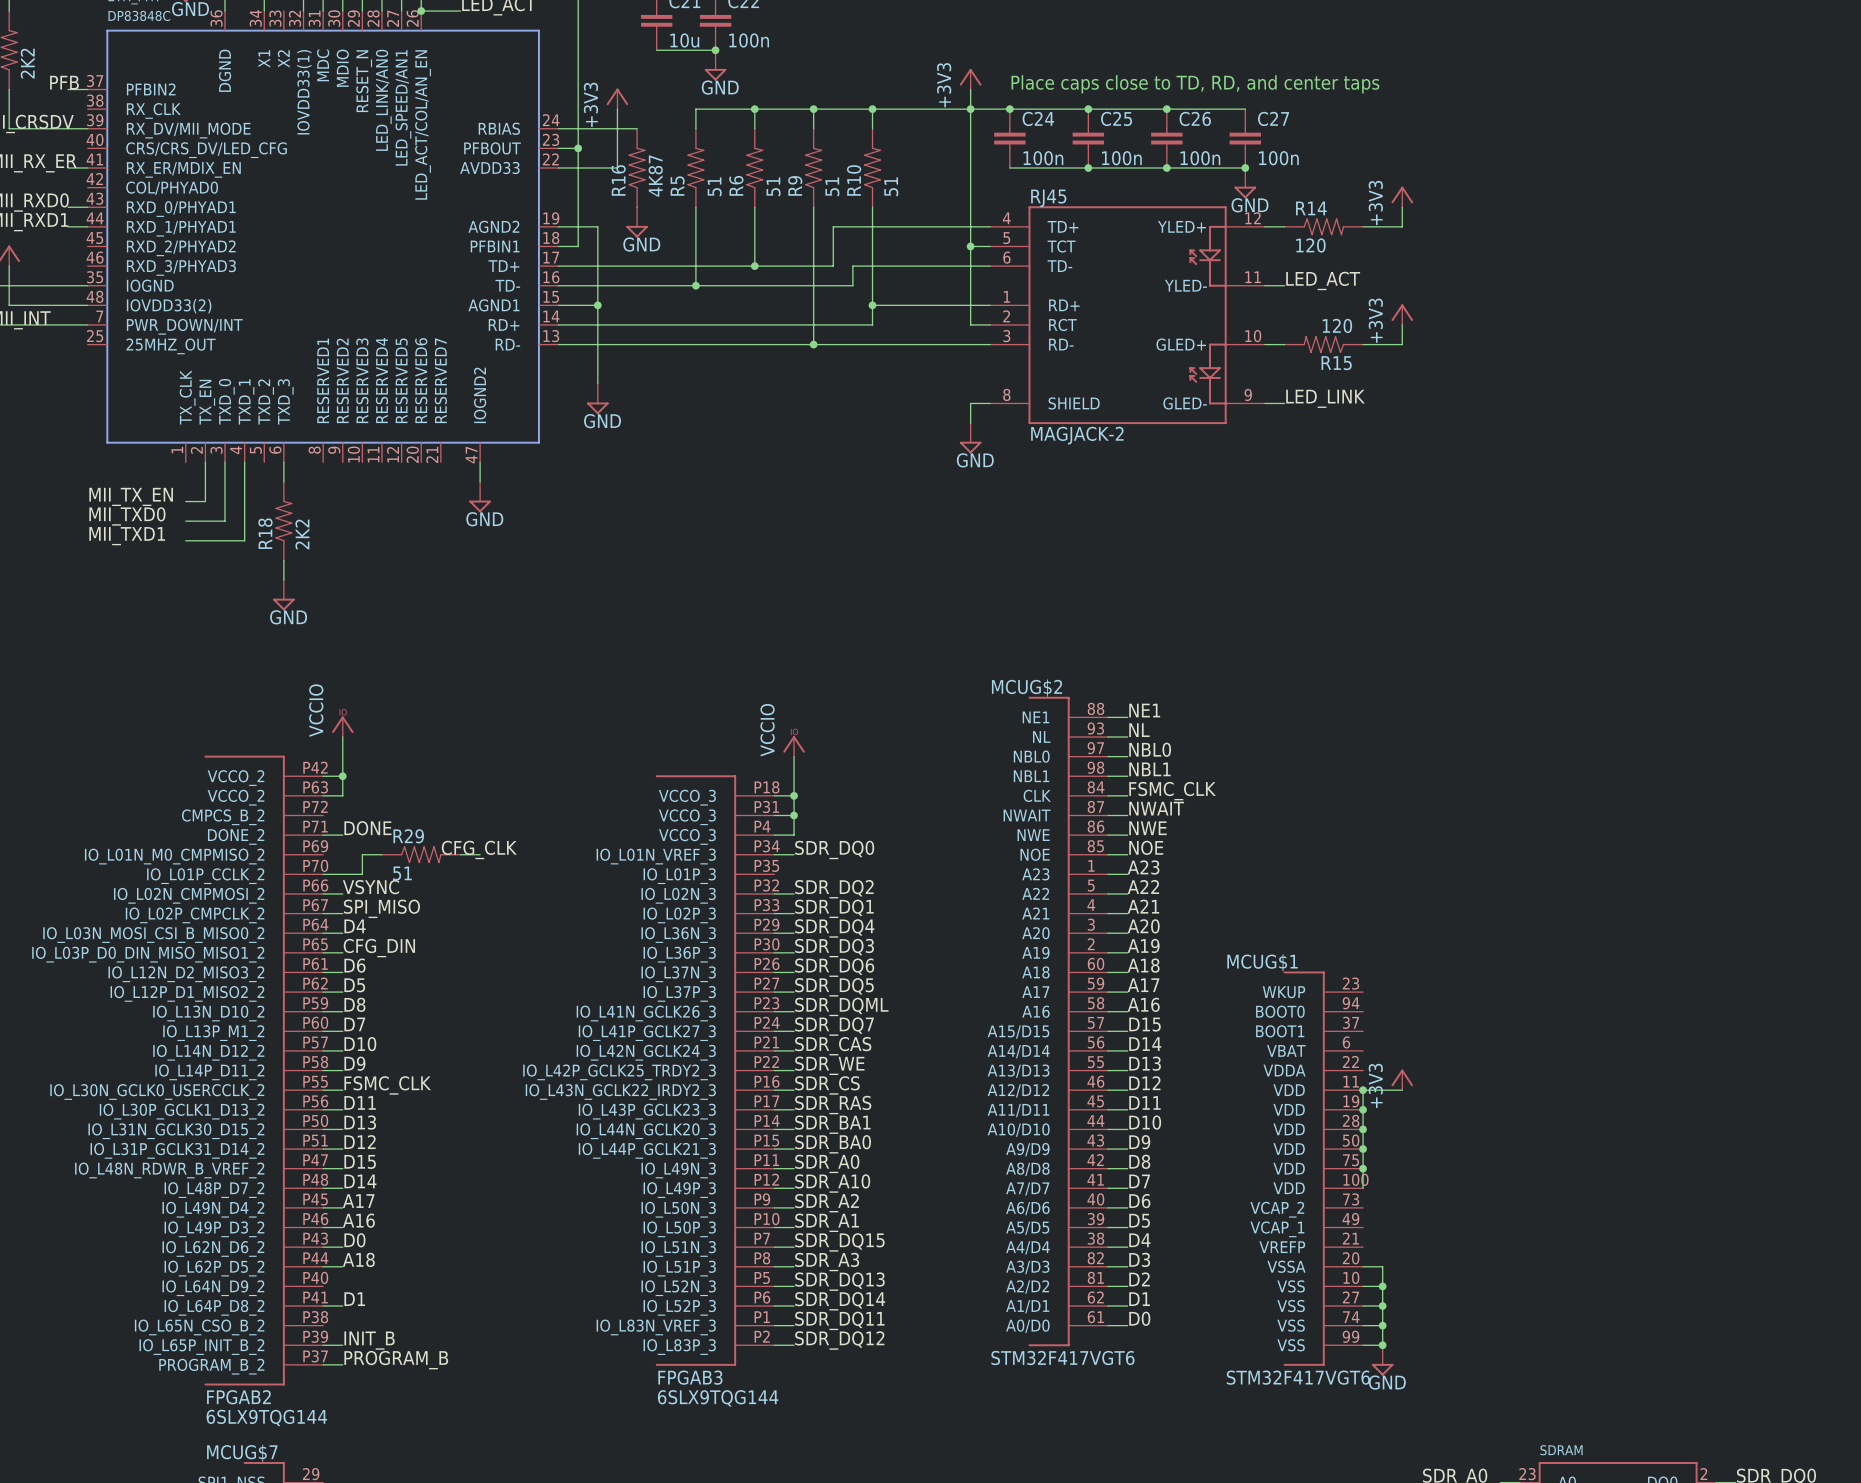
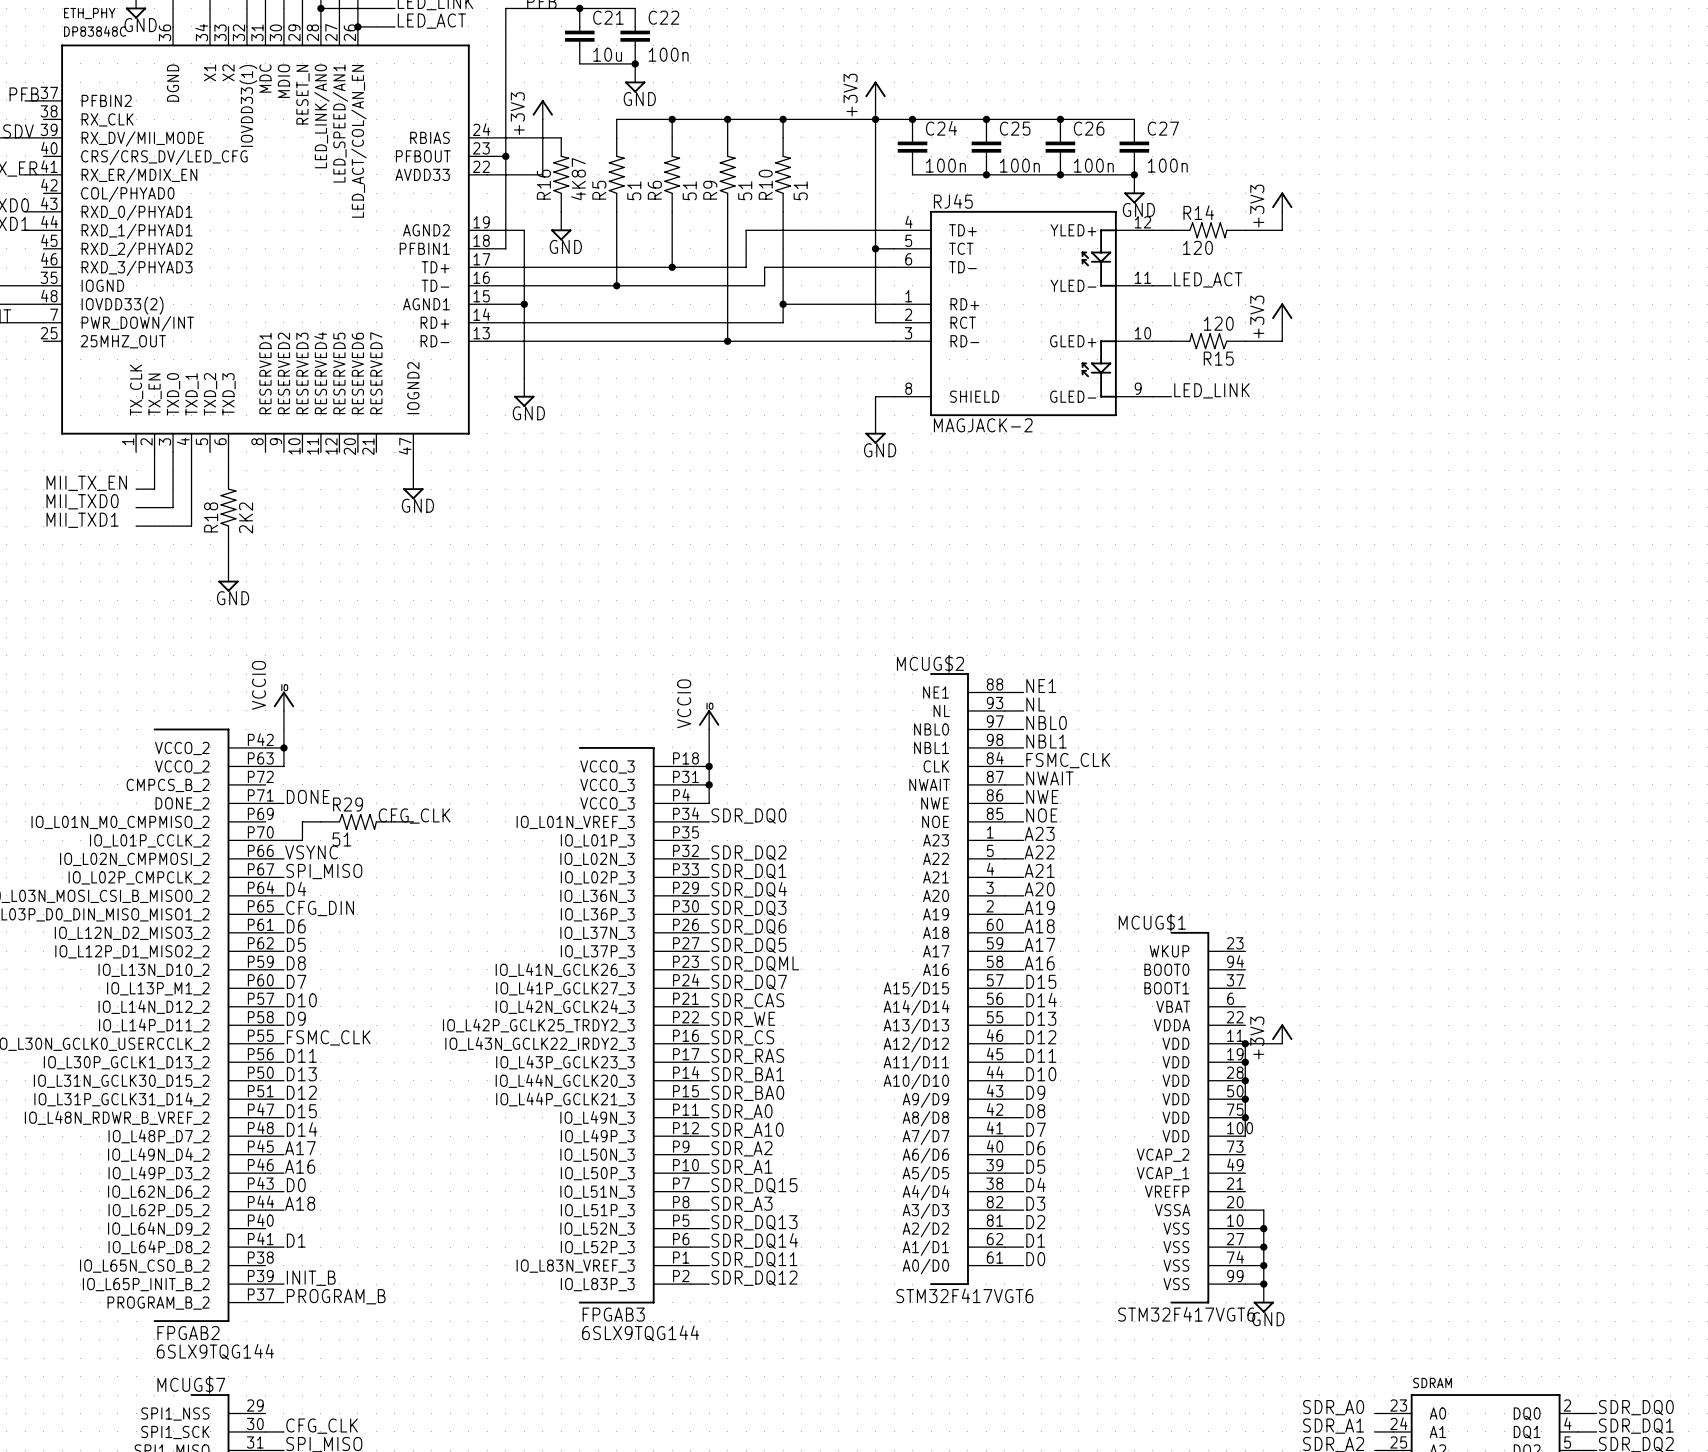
text: Place caps close to TD, RD, and center taps (1195, 84) -> none

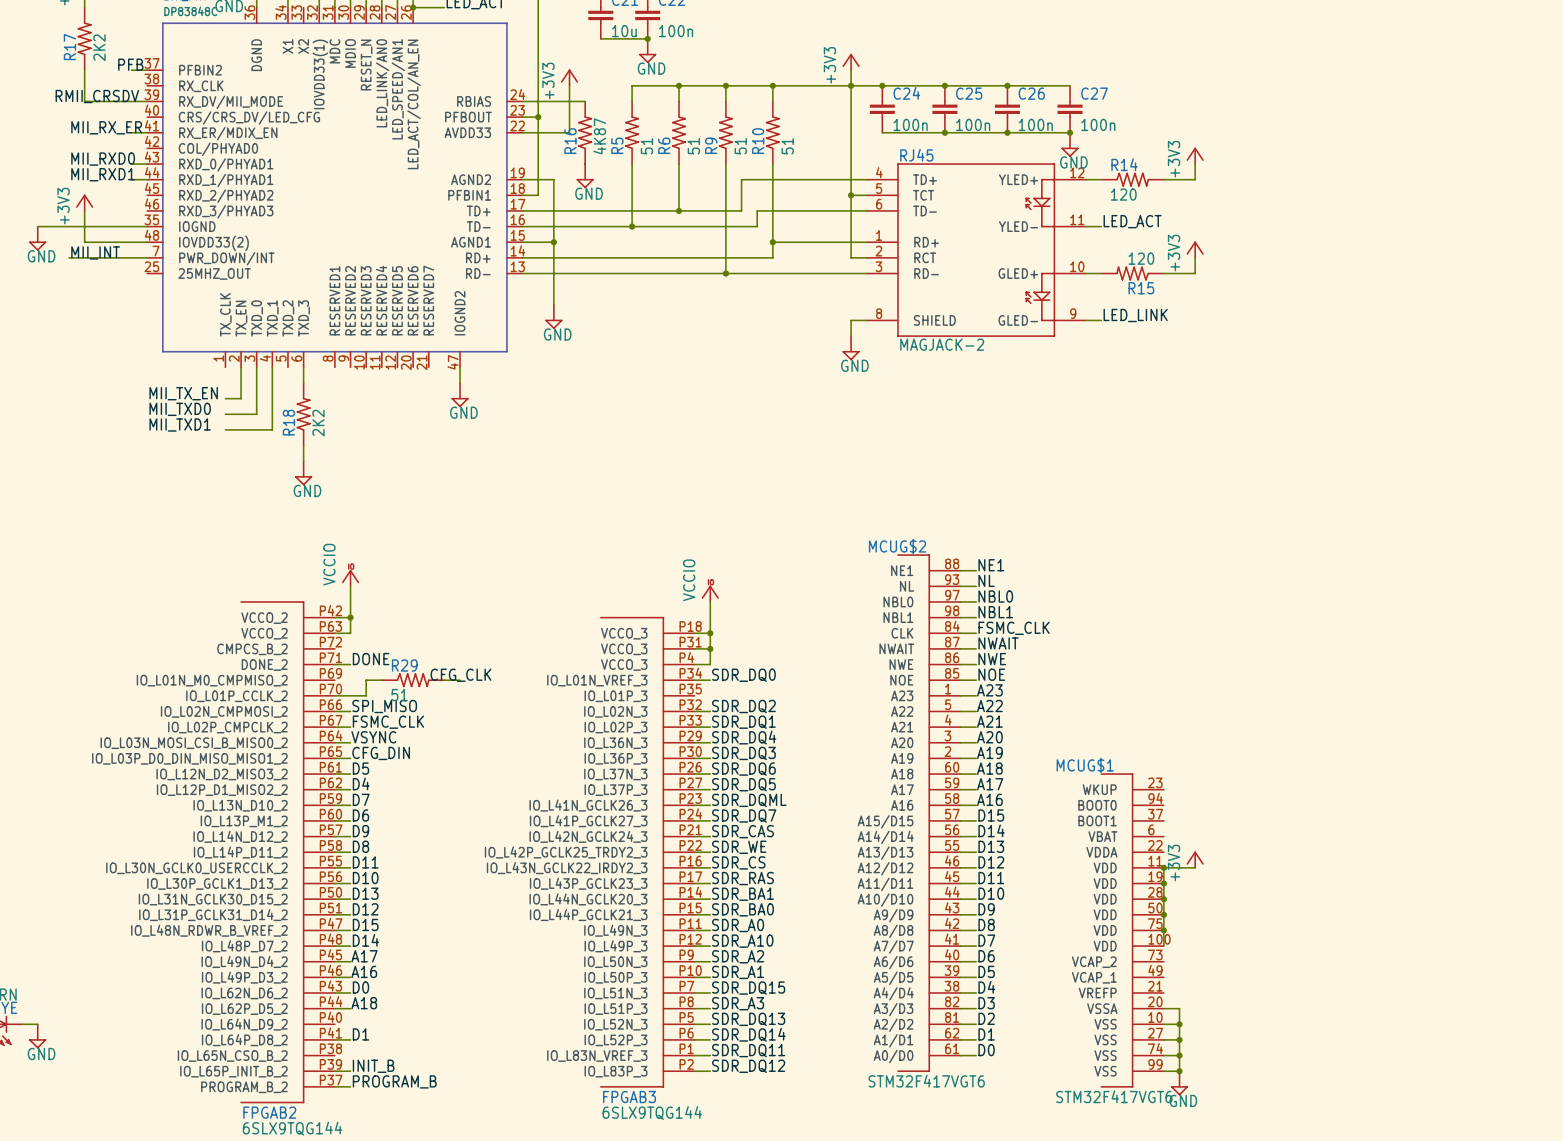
label: VSYNC (311, 852) -> SPI_MISO (384, 706)
label: SPI_MISO (324, 871) -> FSMC_CLK (388, 722)
label: D4 (296, 889) -> VSYNC (373, 737)
label: D6 (296, 926) -> D5 (360, 768)
label: D5 (296, 944) -> D4 (361, 783)
label: D8 (296, 963) -> D7 (361, 799)
label: D7 (296, 981) -> D6 (360, 815)
label: D10 (301, 1000) -> D9 (360, 831)
label: D9 (296, 1018) -> D8 (360, 846)
label: FSMC_CLK (328, 1037) -> D11 (365, 862)
label: D11 (301, 1055) -> D10 (365, 878)

